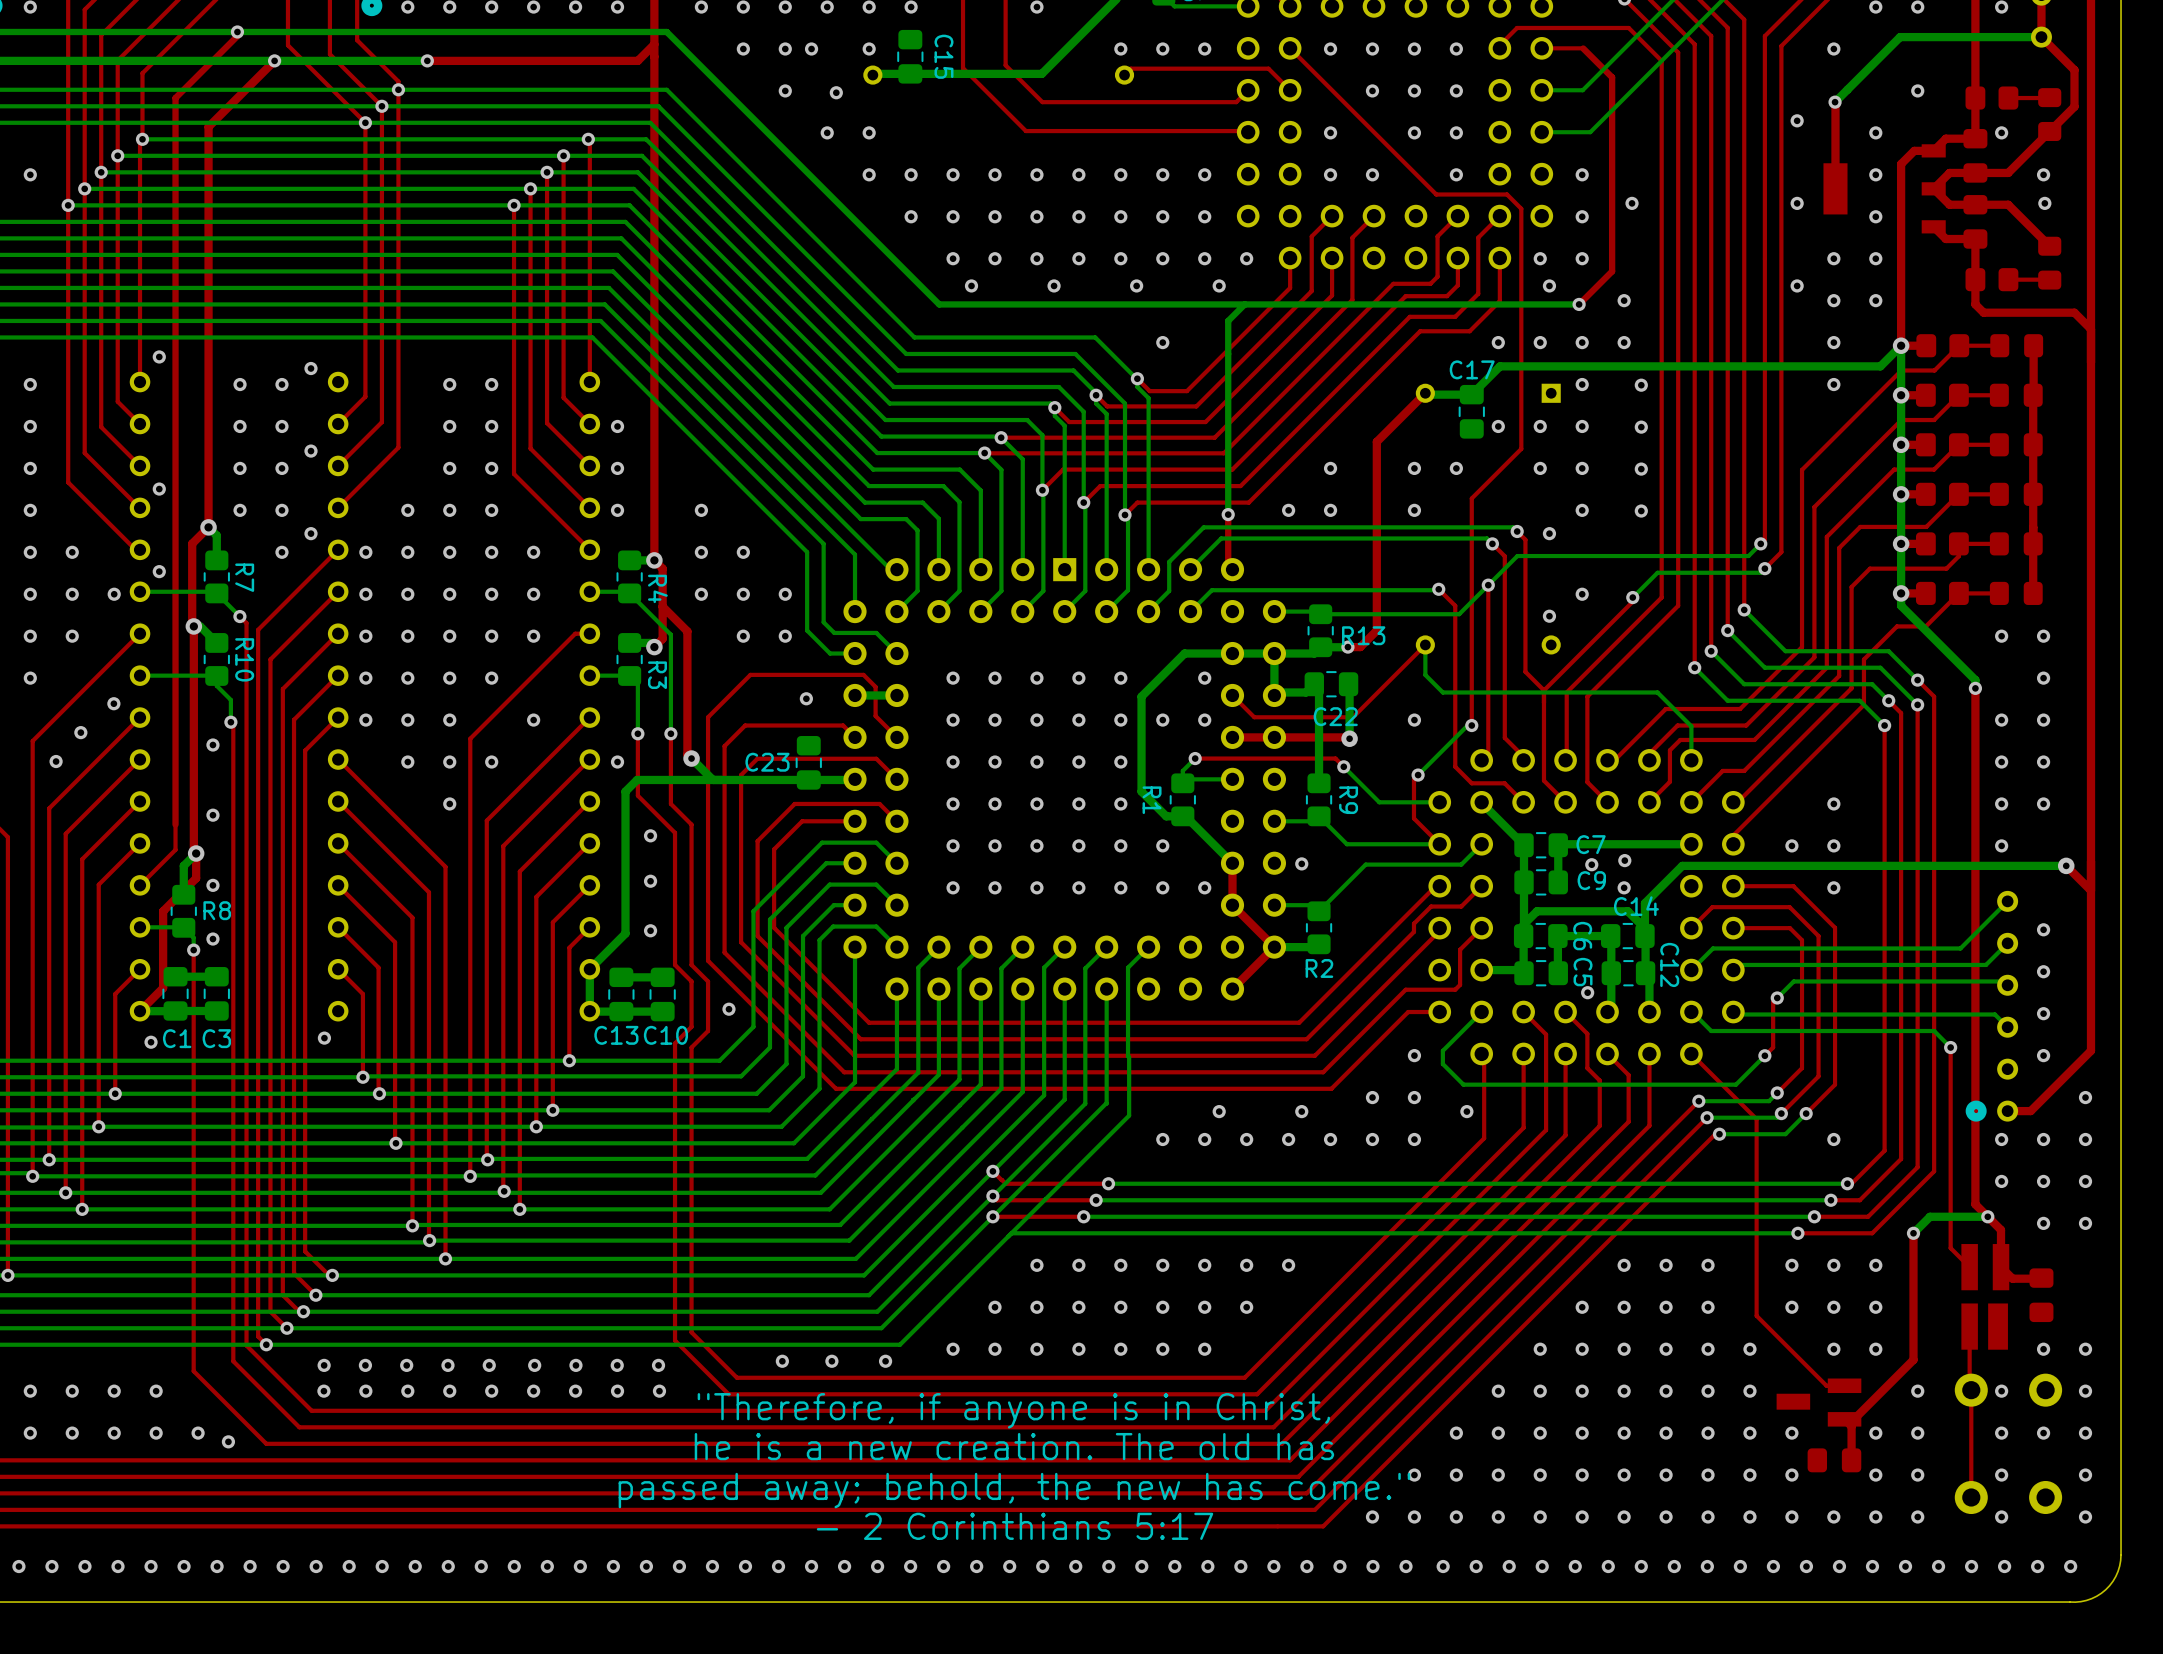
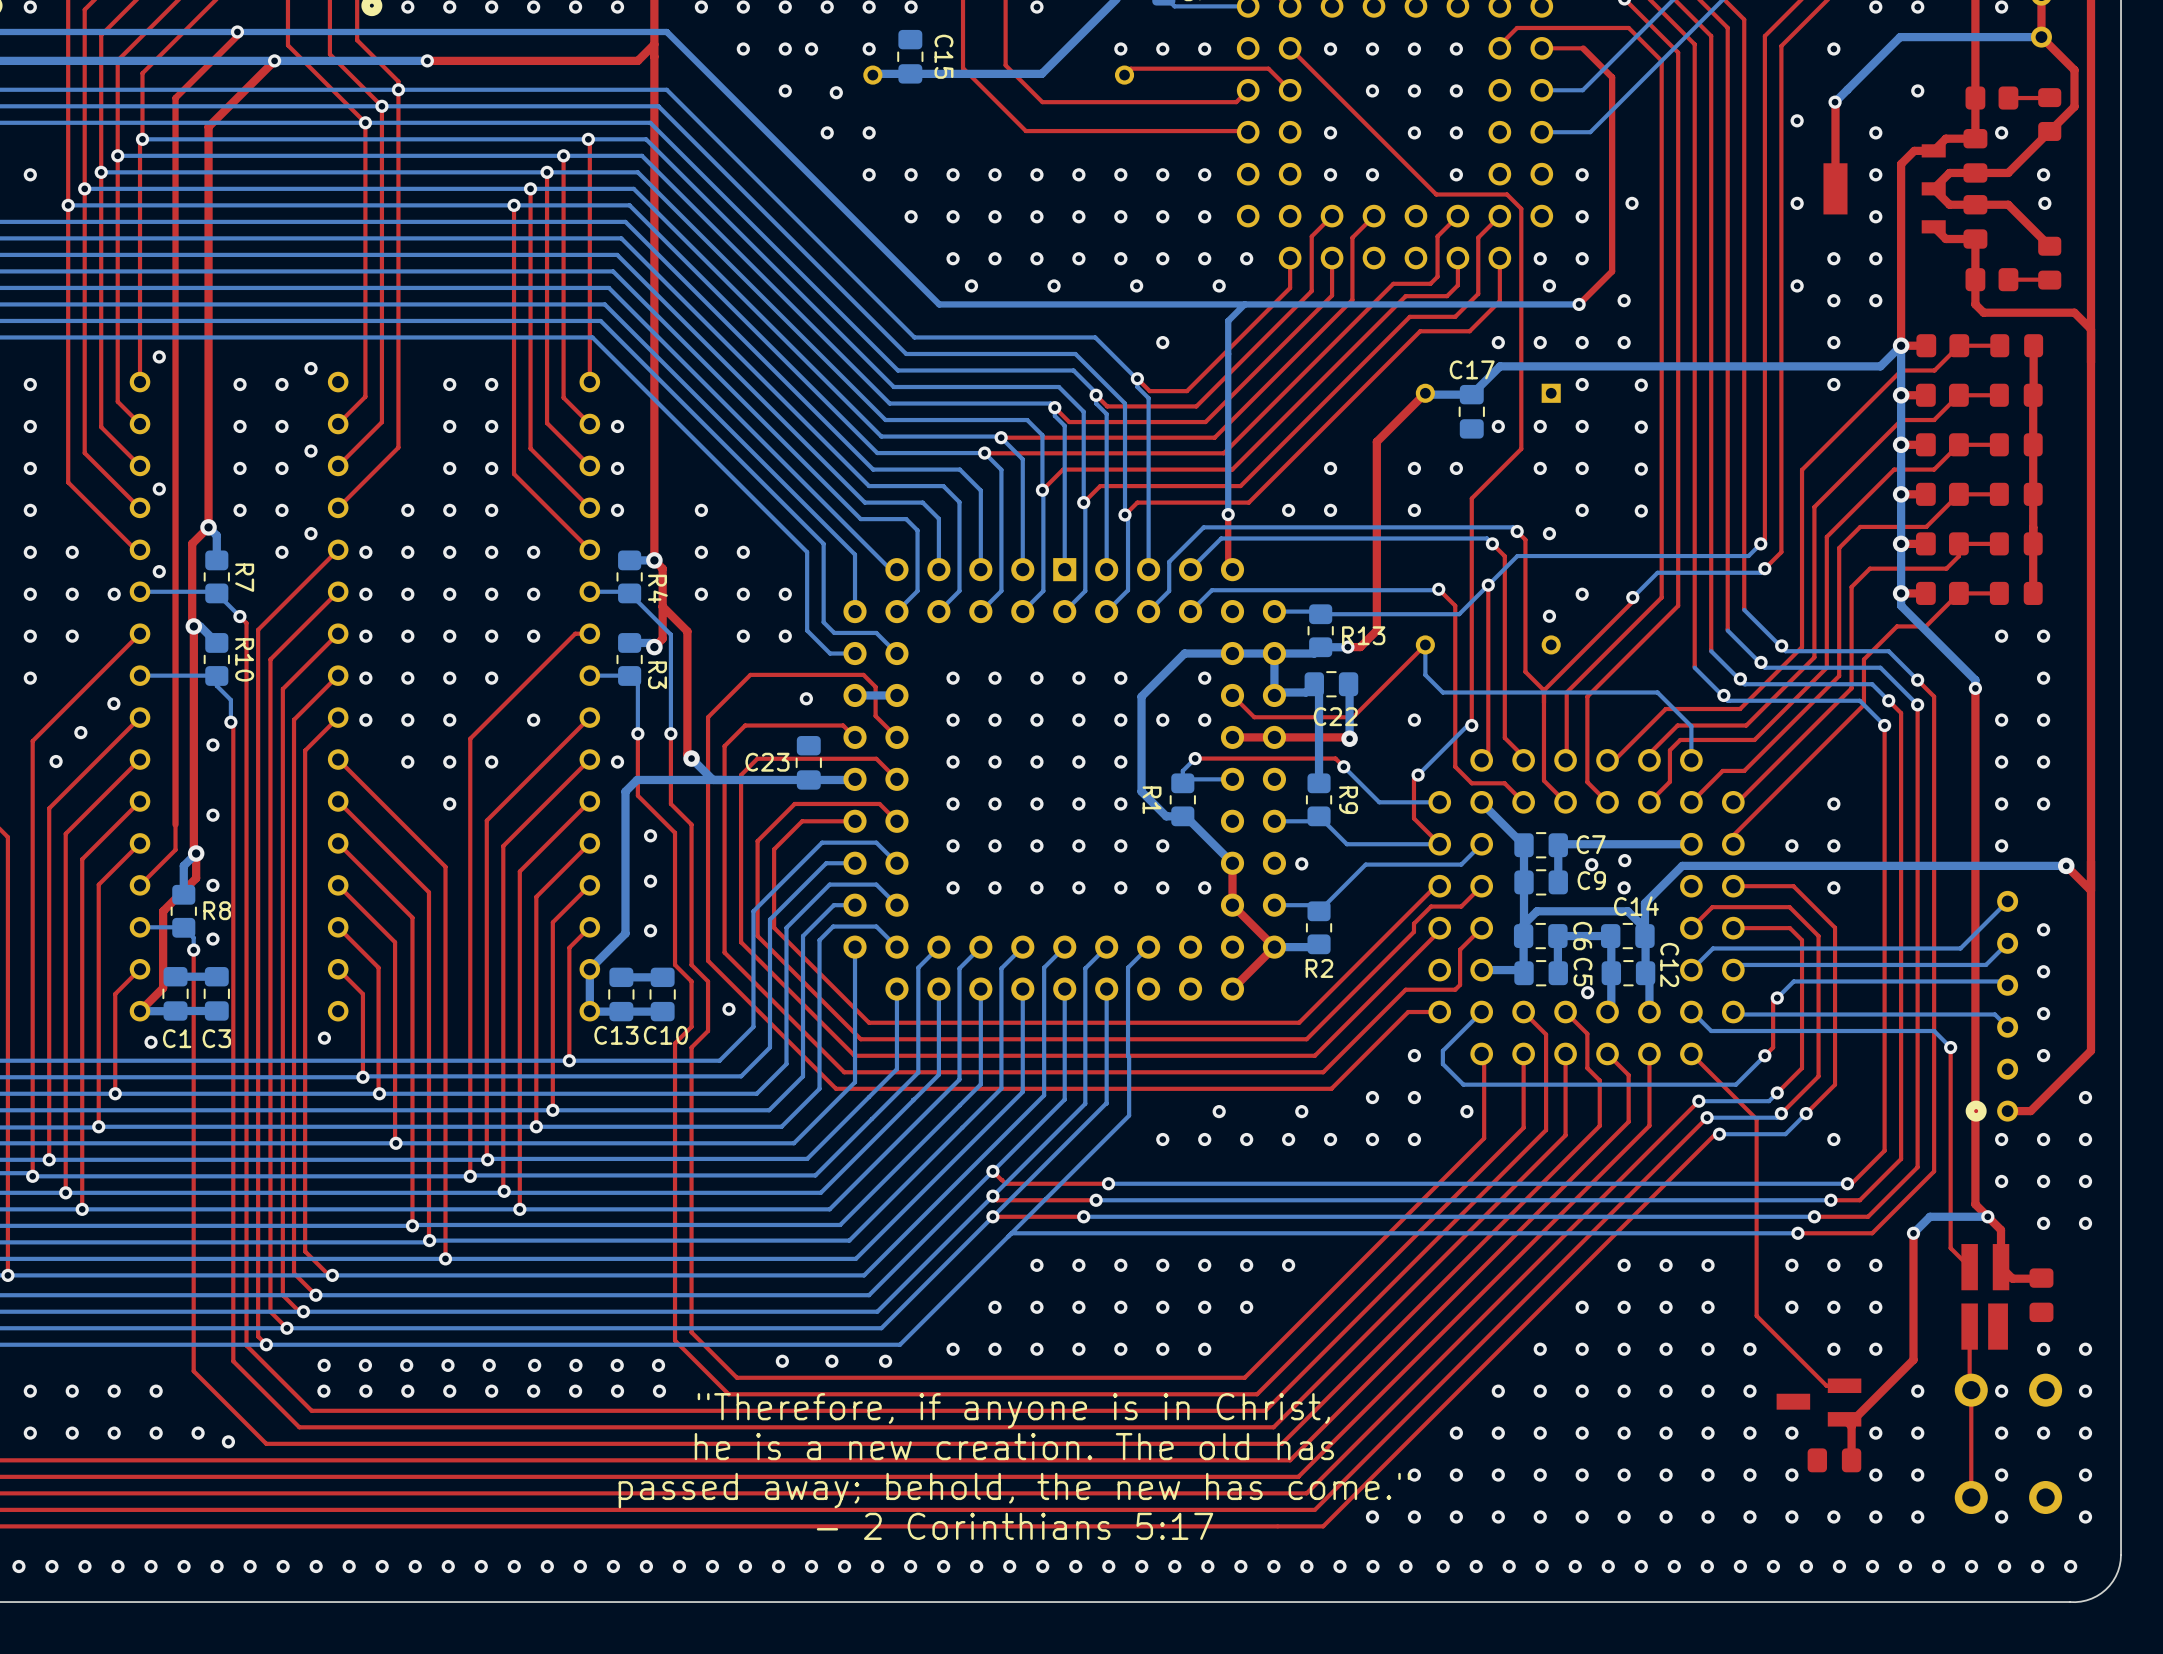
via: (1744, 609) -> none
via: (1727, 630) -> none
via: none -> (1781, 645)
via: (1711, 651) -> none
via: none -> (1761, 662)
via: (1694, 667) -> none
via: none -> (1740, 678)
via: none -> (1723, 695)

